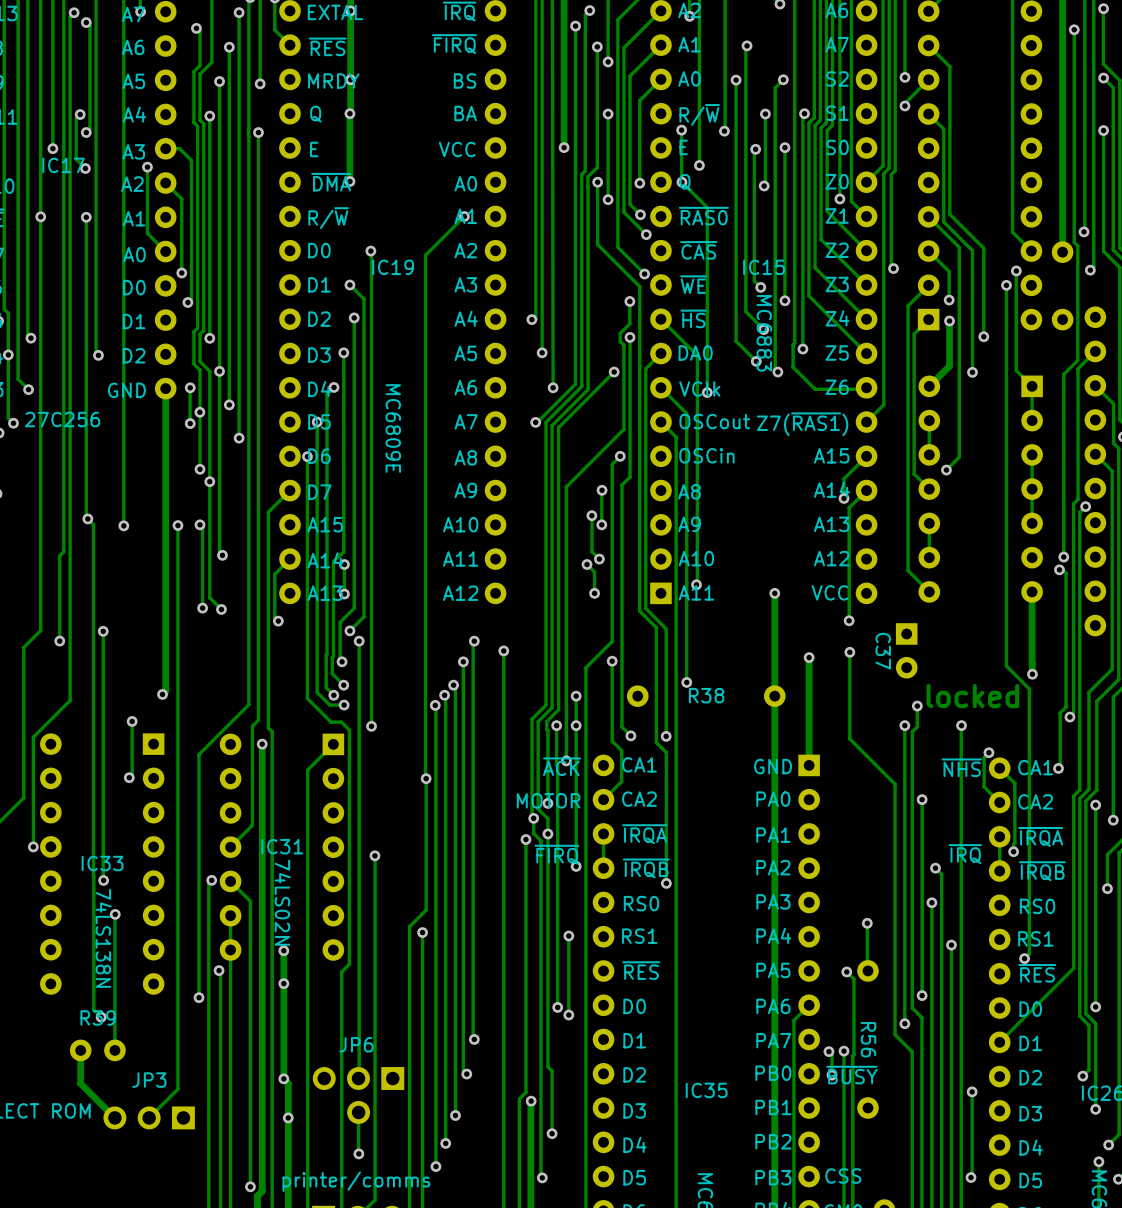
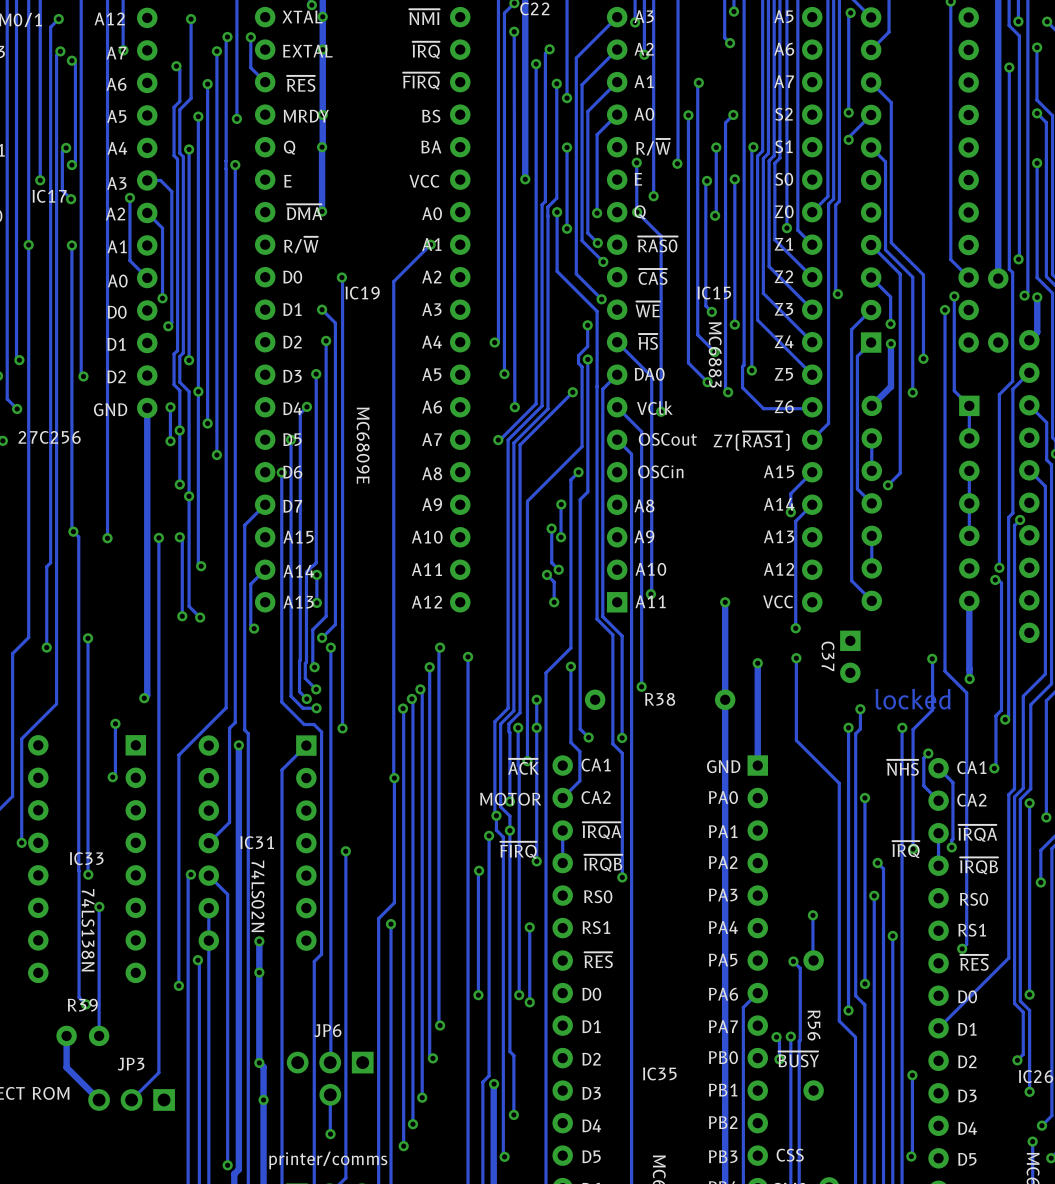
track: none -> (1037, 297) (1037, 332) (1029, 340)
via: none -> (1037, 297)
track: none -> (932, 658) (932, 710) (913, 729) (913, 849)
via: none -> (932, 658)
via: none -> (913, 849)
track: none -> (479, 870) (478, 995)
via: none -> (479, 870)
via: none -> (478, 995)

